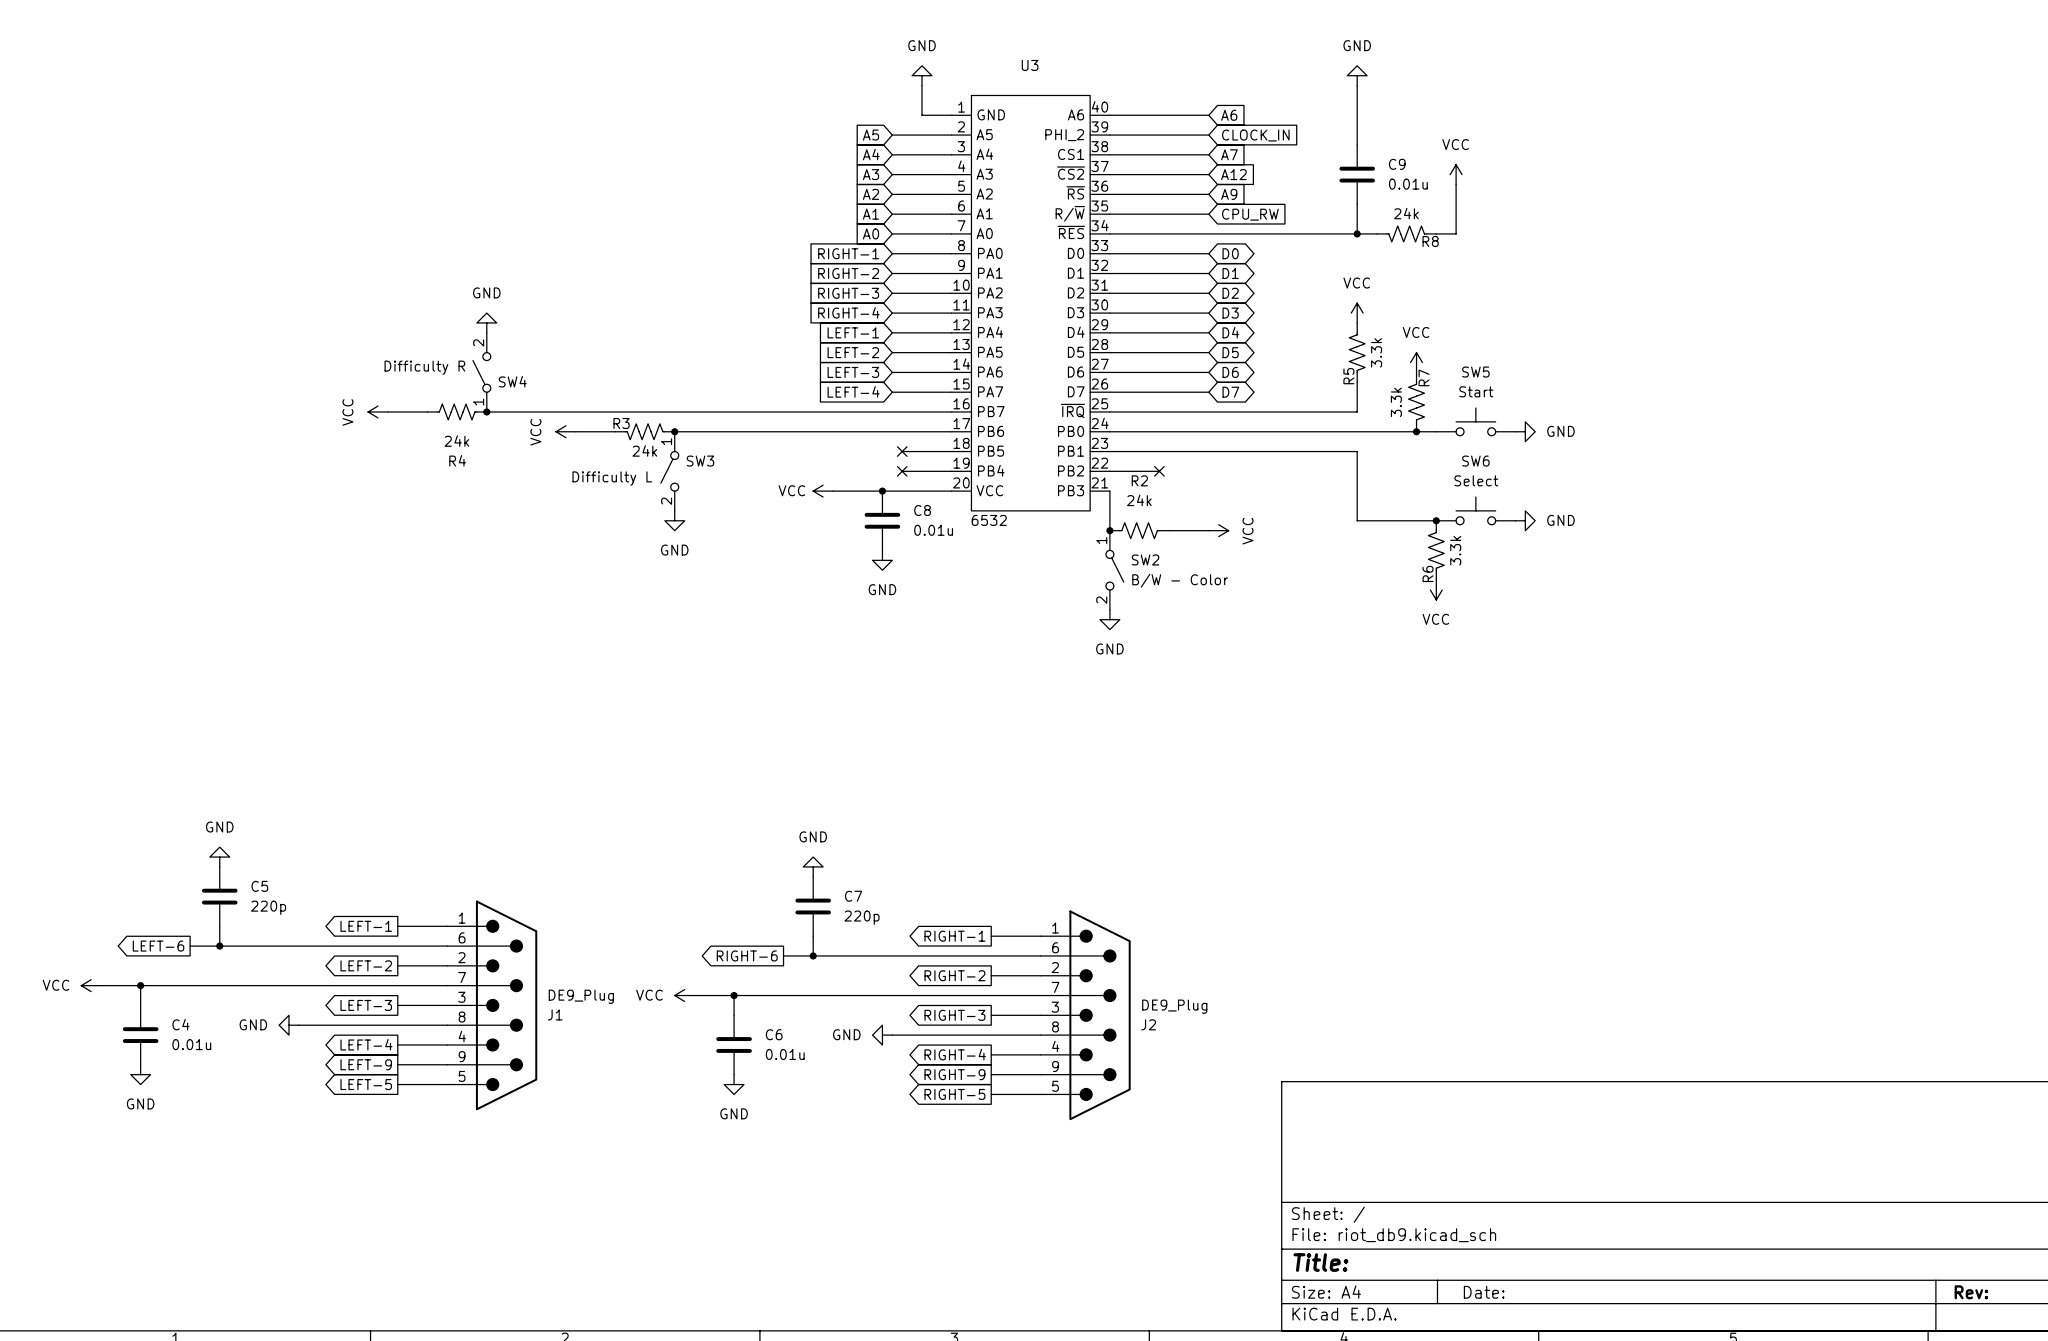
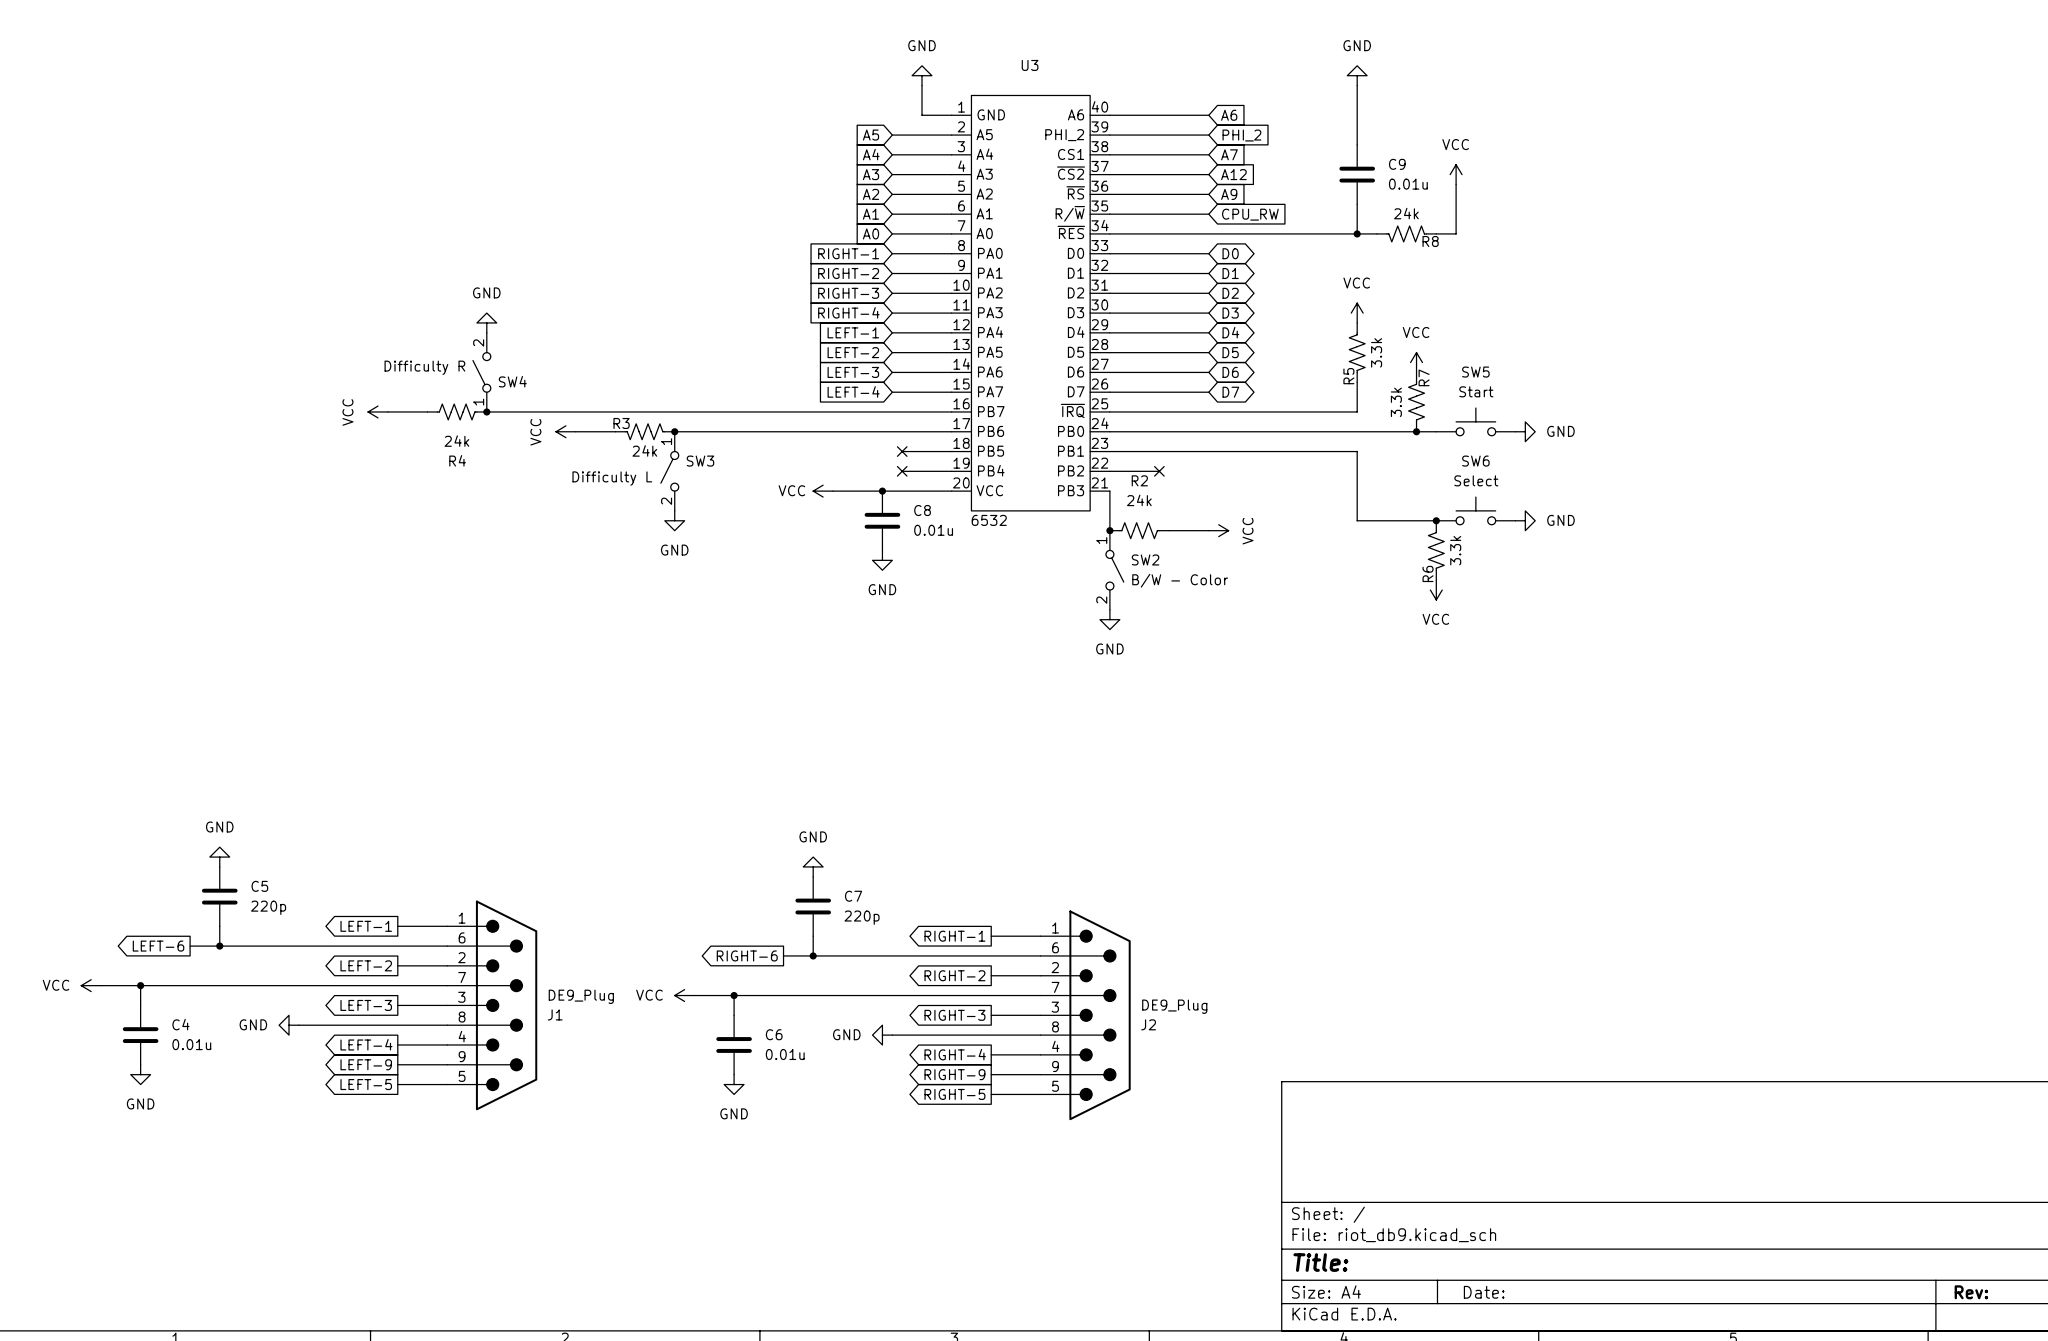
global label: CLOCK_IN (1255, 135) -> PHI_2 (1241, 135)

